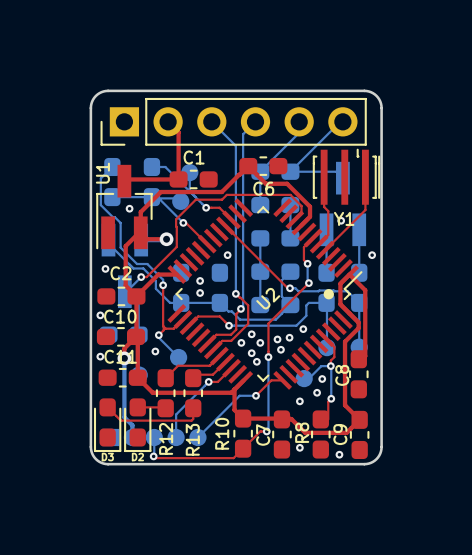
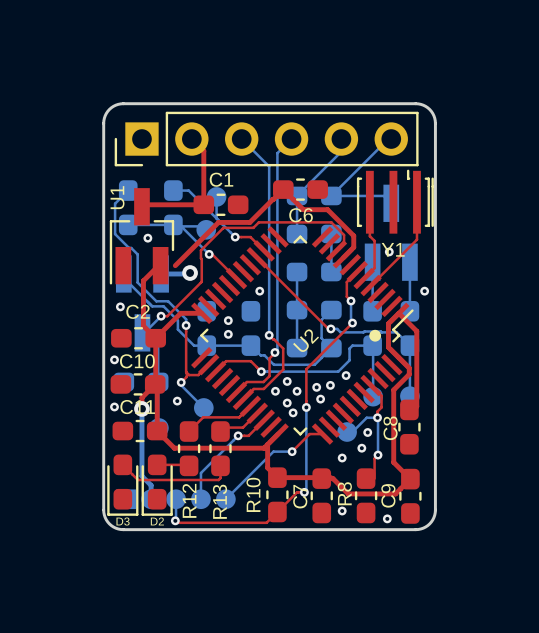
top track: (221, 192) (160, 192) (140, 212) (140, 232) (147, 239) (166, 239) -> (253, 219) (249, 222) (218, 222) (175, 265)

